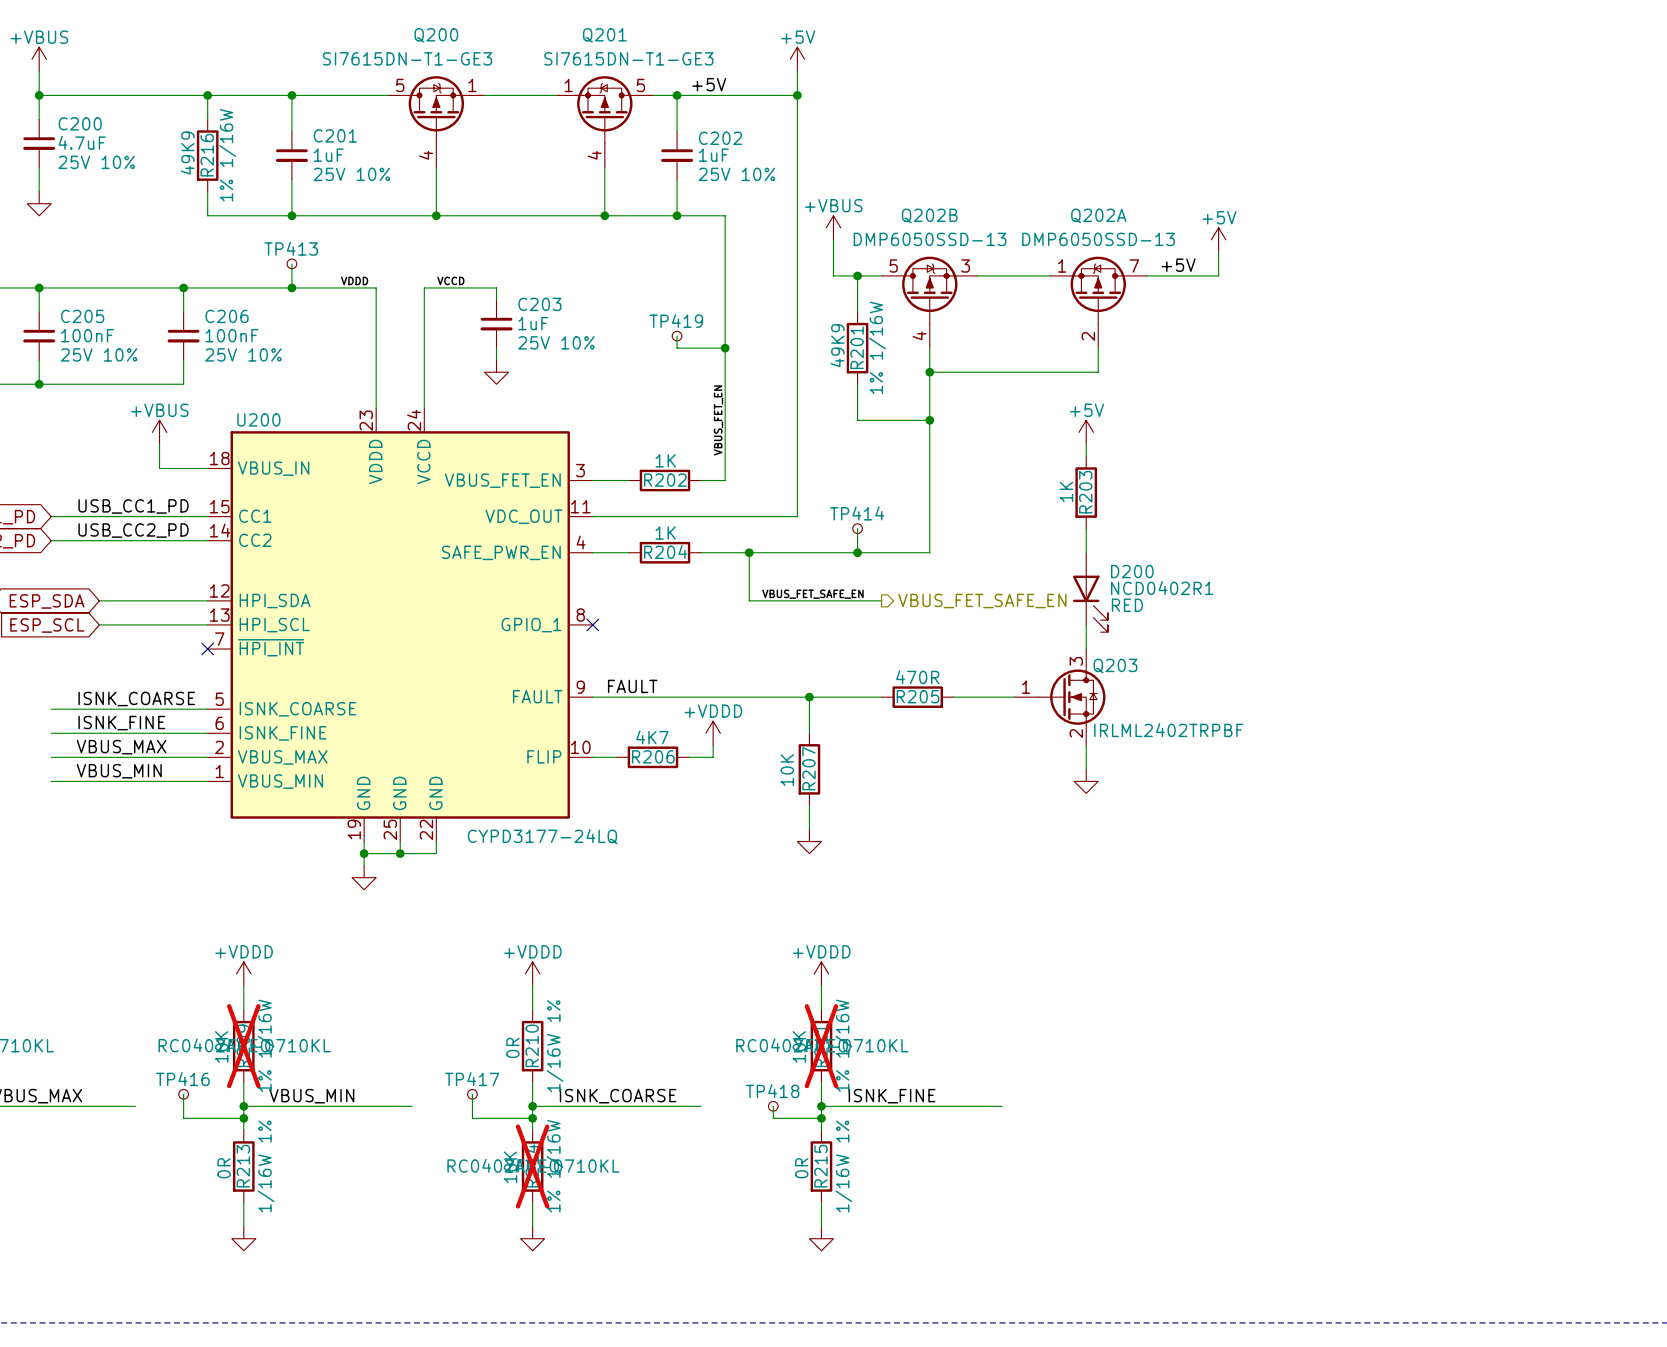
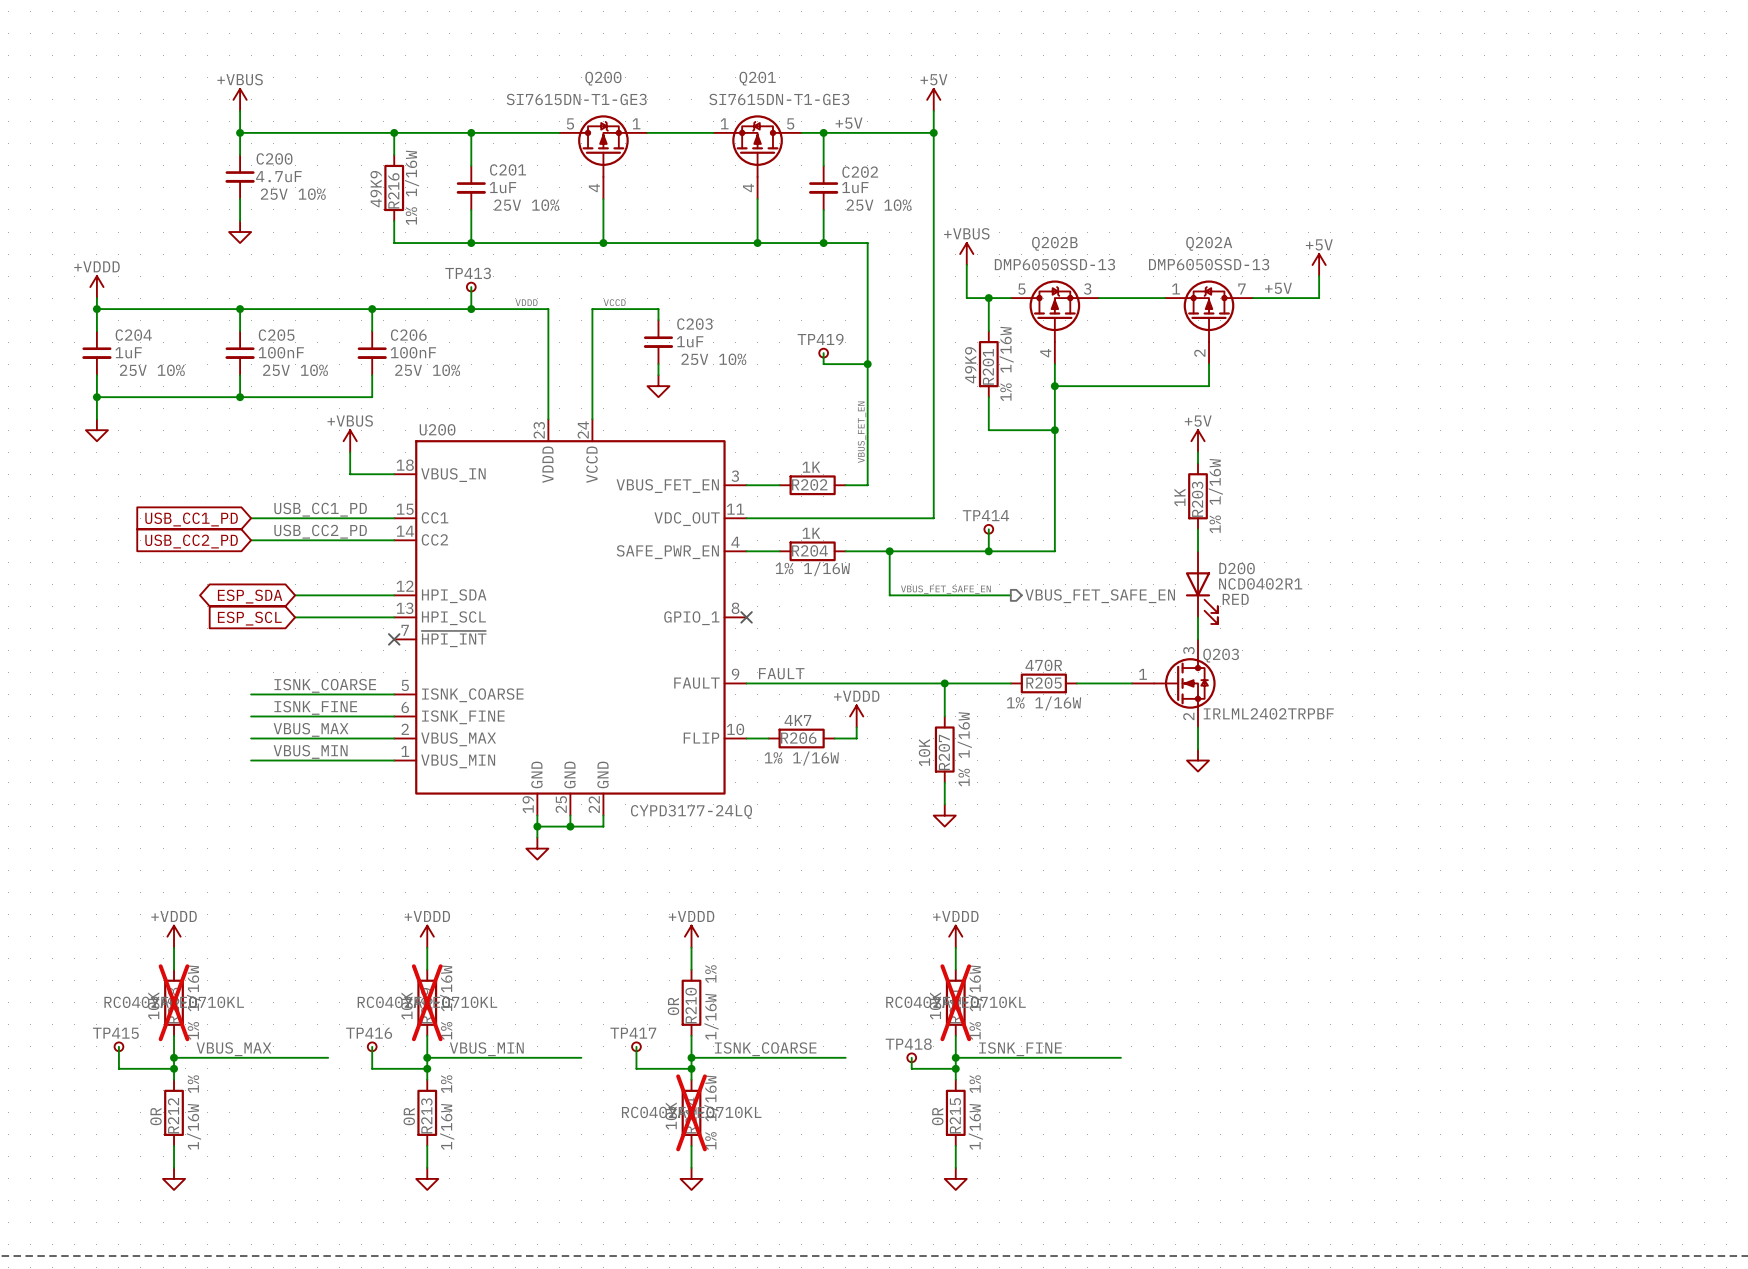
R203 text: none -> 1% 1/16W (1215, 496)
R204 text: none -> 1% 1/16W (812, 569)
R205 text: none -> 1% 1/16W (1043, 703)
R207 text: none -> 1% 1/16W (964, 749)
R206 text: none -> 1% 1/16W (801, 758)

